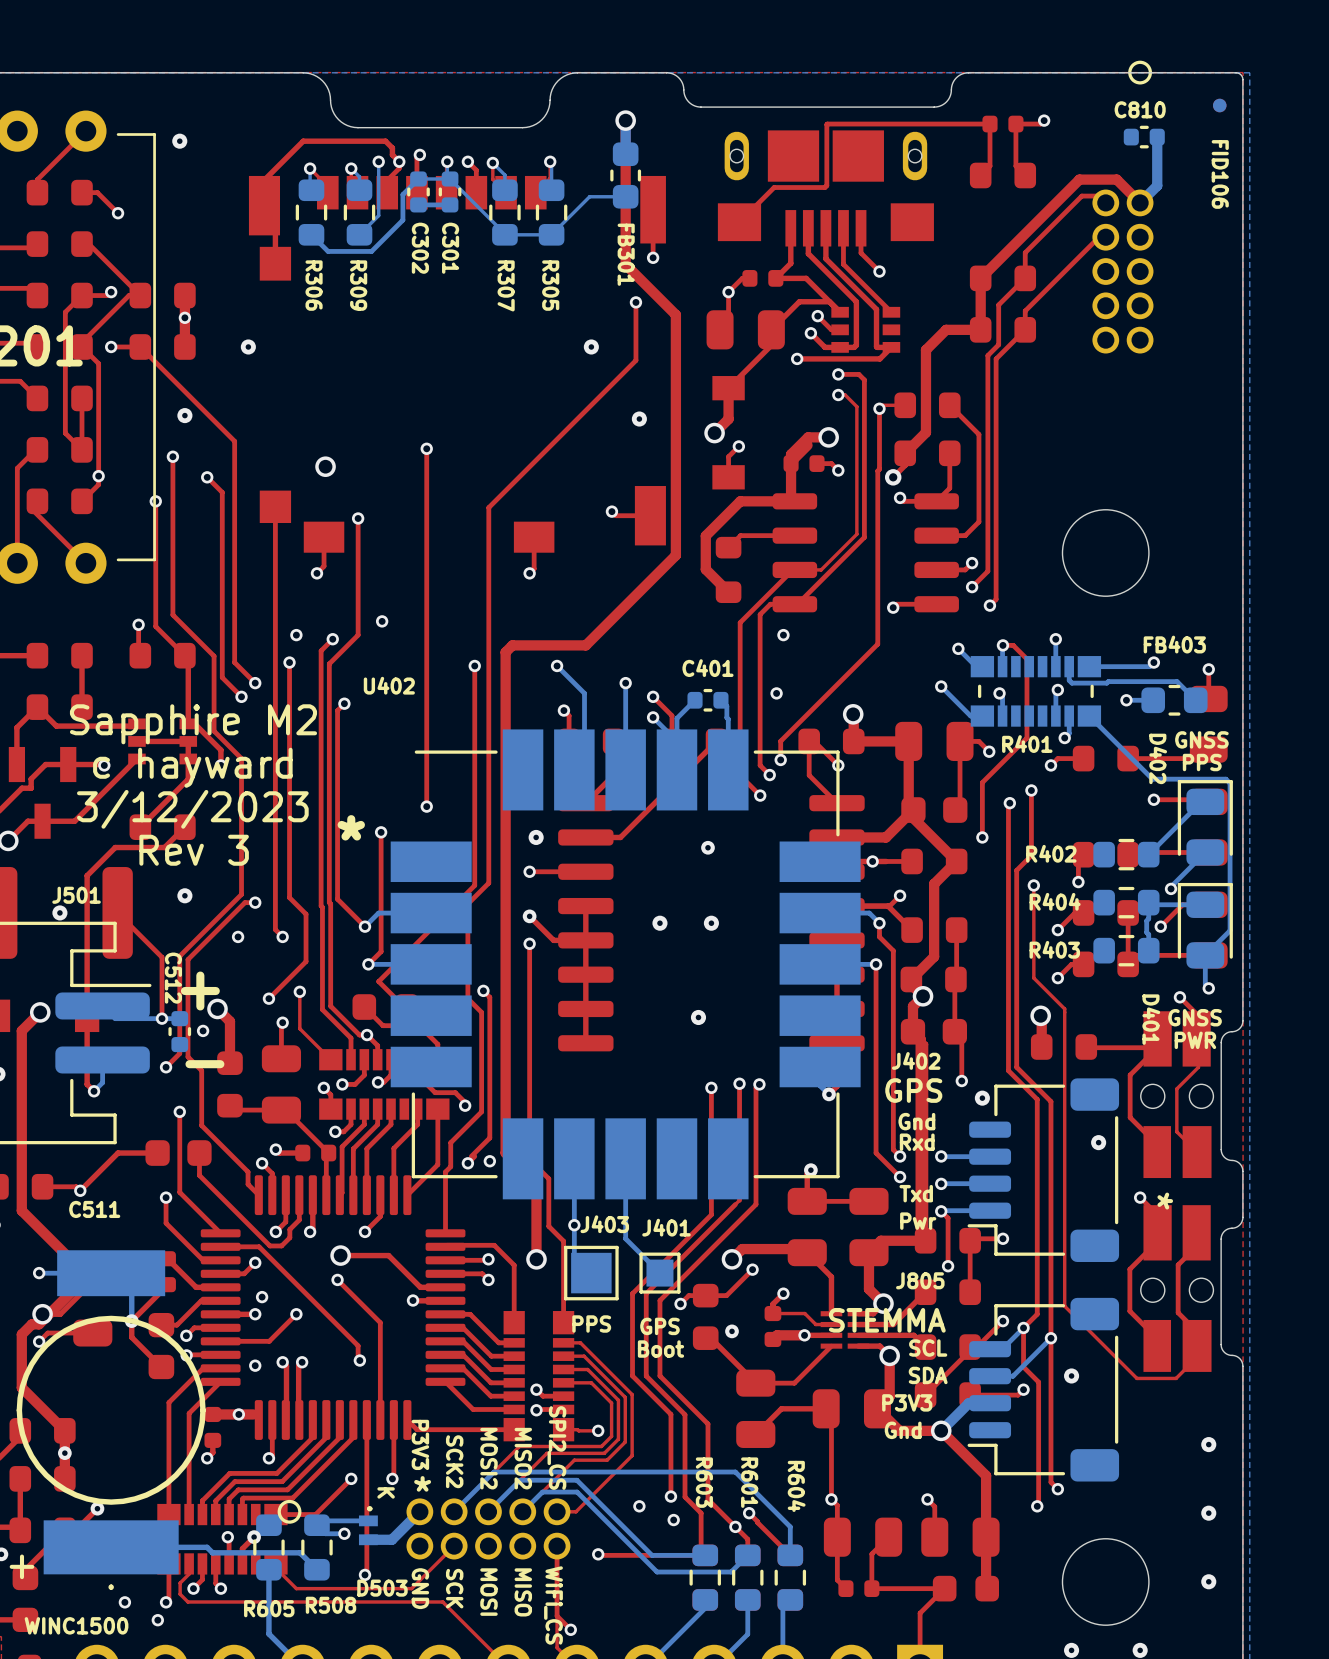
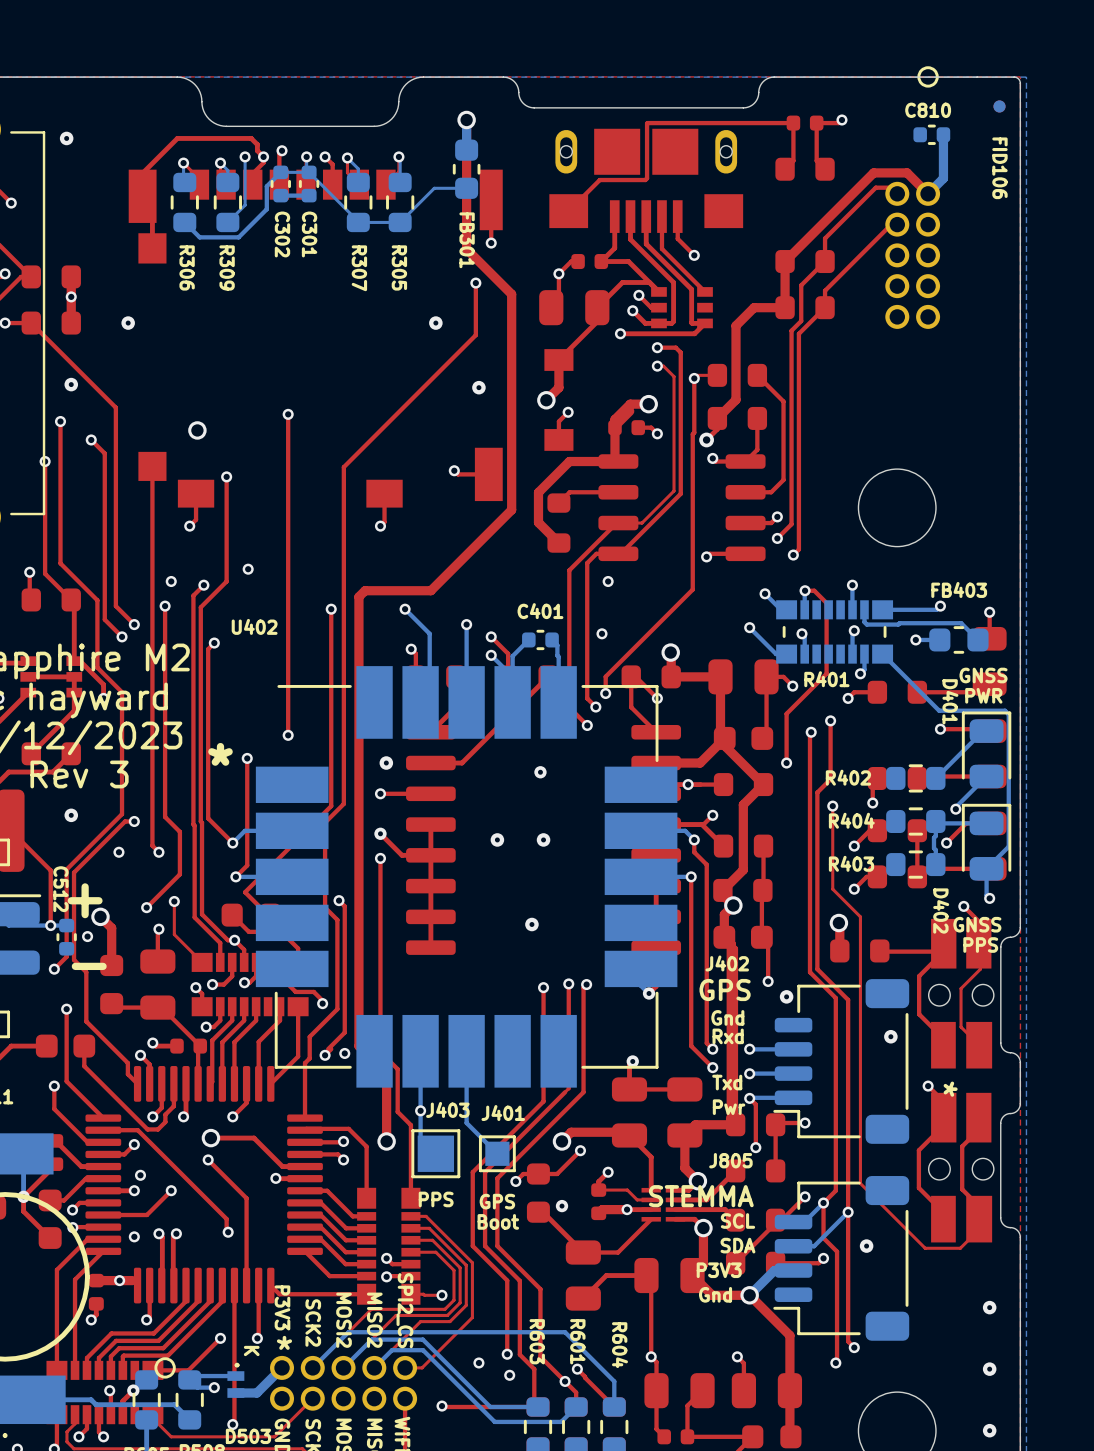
D402 name position: D402 (1158, 758) -> D402 (941, 911)
text: PPS (1202, 762) -> PWR (983, 695)
D401 name position: D401 (1151, 1019) -> D401 (950, 701)
text: PWR (1195, 1040) -> PPS (980, 945)

